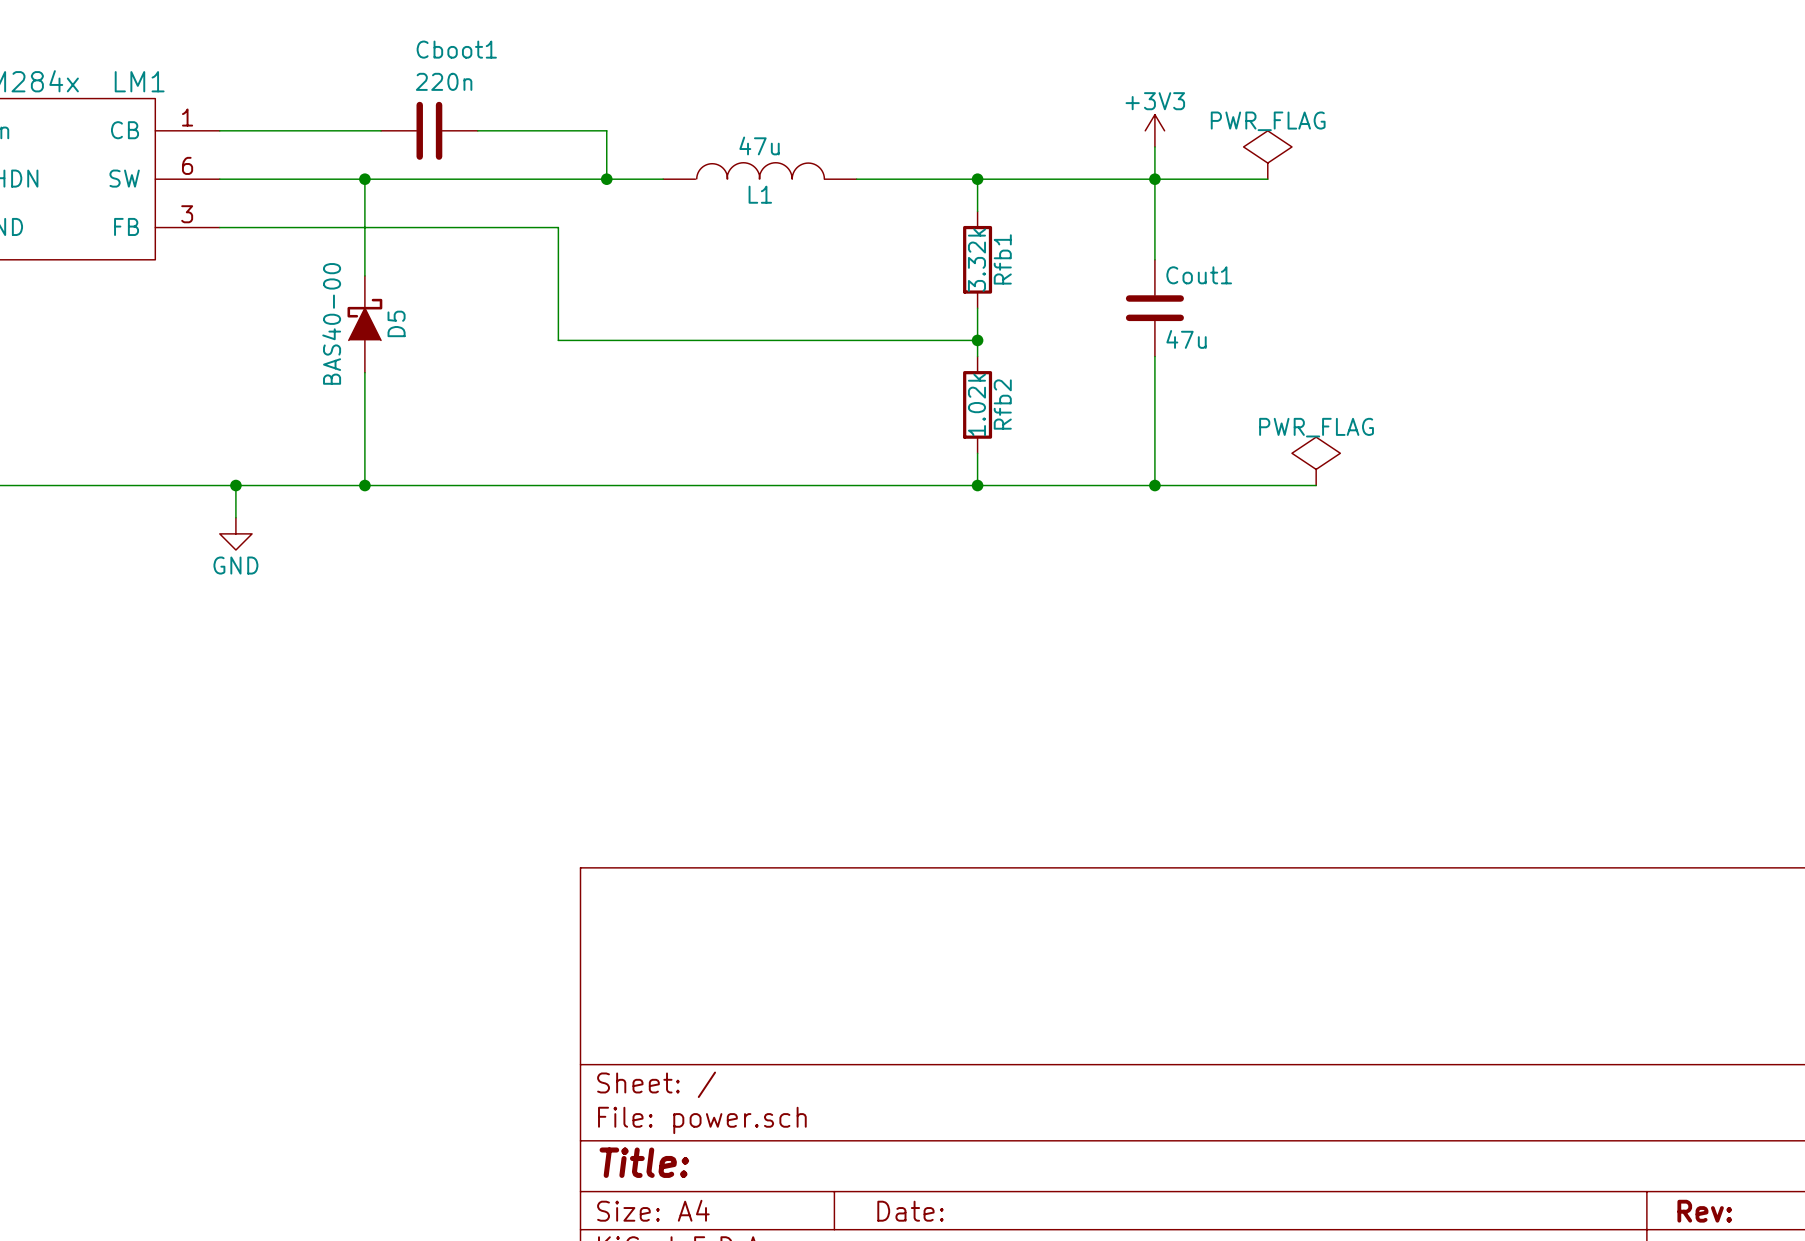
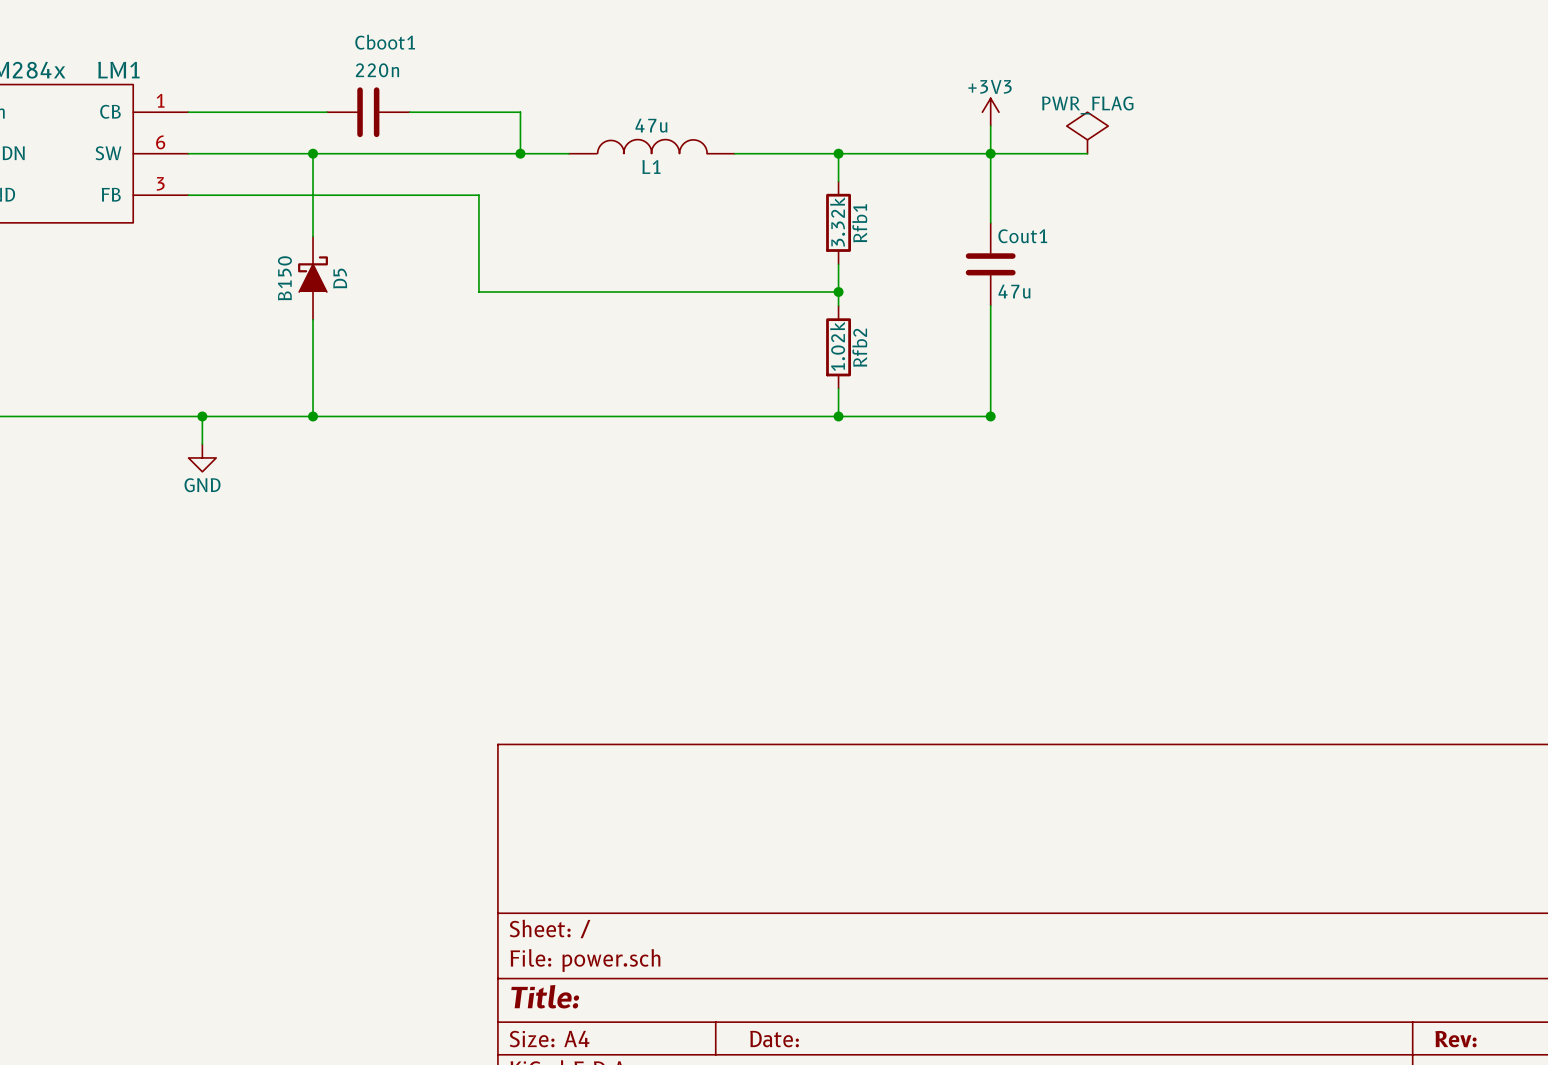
D5 value: BAS40-00 (331, 323) -> B150 (284, 278)
power symbol: PWR_FLAG (1316, 461) -> none
wire: (1154, 485) (1316, 485) -> none

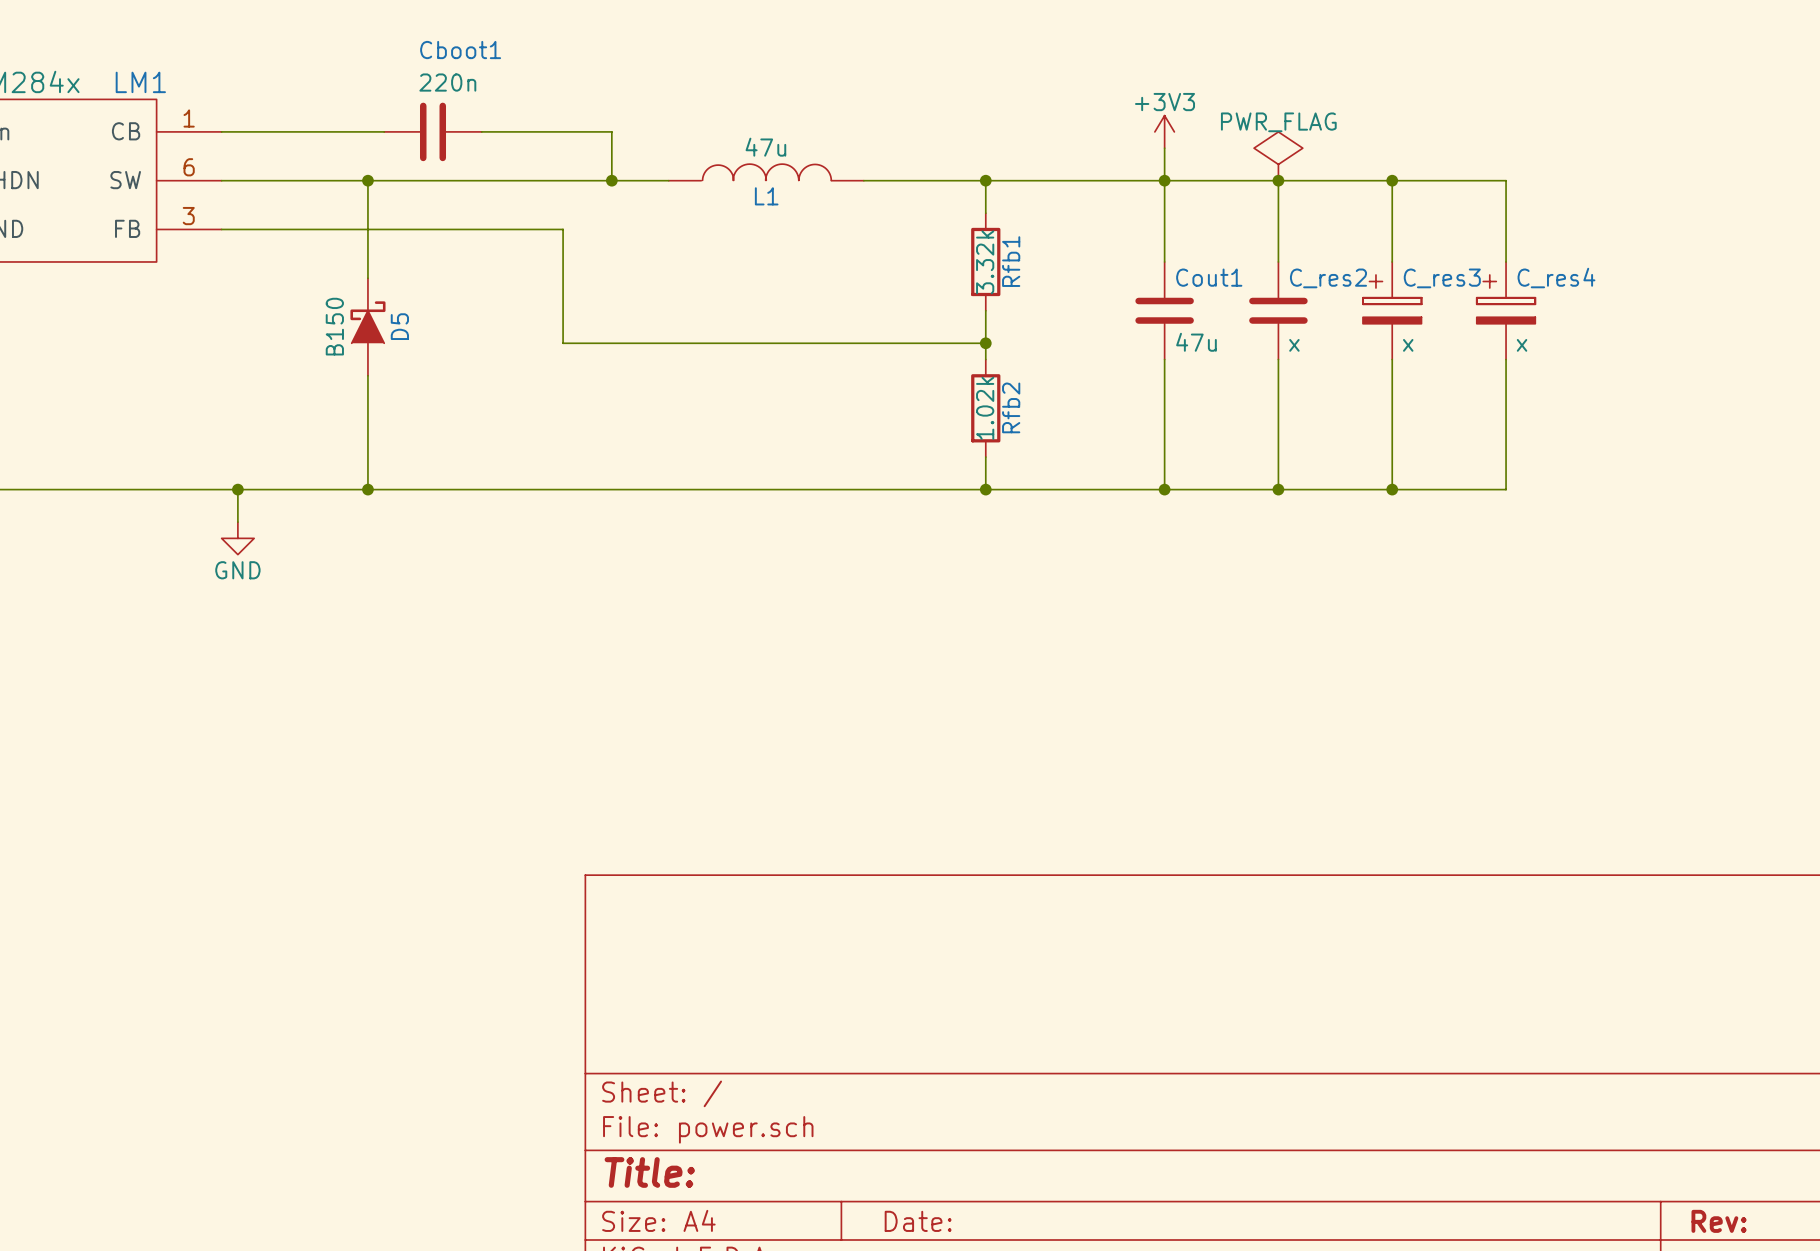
junction: none -> (1278, 180)
wire: none -> (1392, 180) (1392, 261)
junction: none -> (1392, 180)
wire: none -> (1278, 261) (1278, 180) (1506, 180) (1506, 261)
C_res2: none -> x (1278, 310)
C_res3: none -> x (1392, 310)
C_res4: none -> x (1506, 310)
wire: none -> (1278, 359) (1278, 489)
wire: none -> (1392, 359) (1392, 489)
wire: none -> (1506, 359) (1506, 489) (1164, 489)
junction: none -> (1278, 489)
junction: none -> (1392, 489)

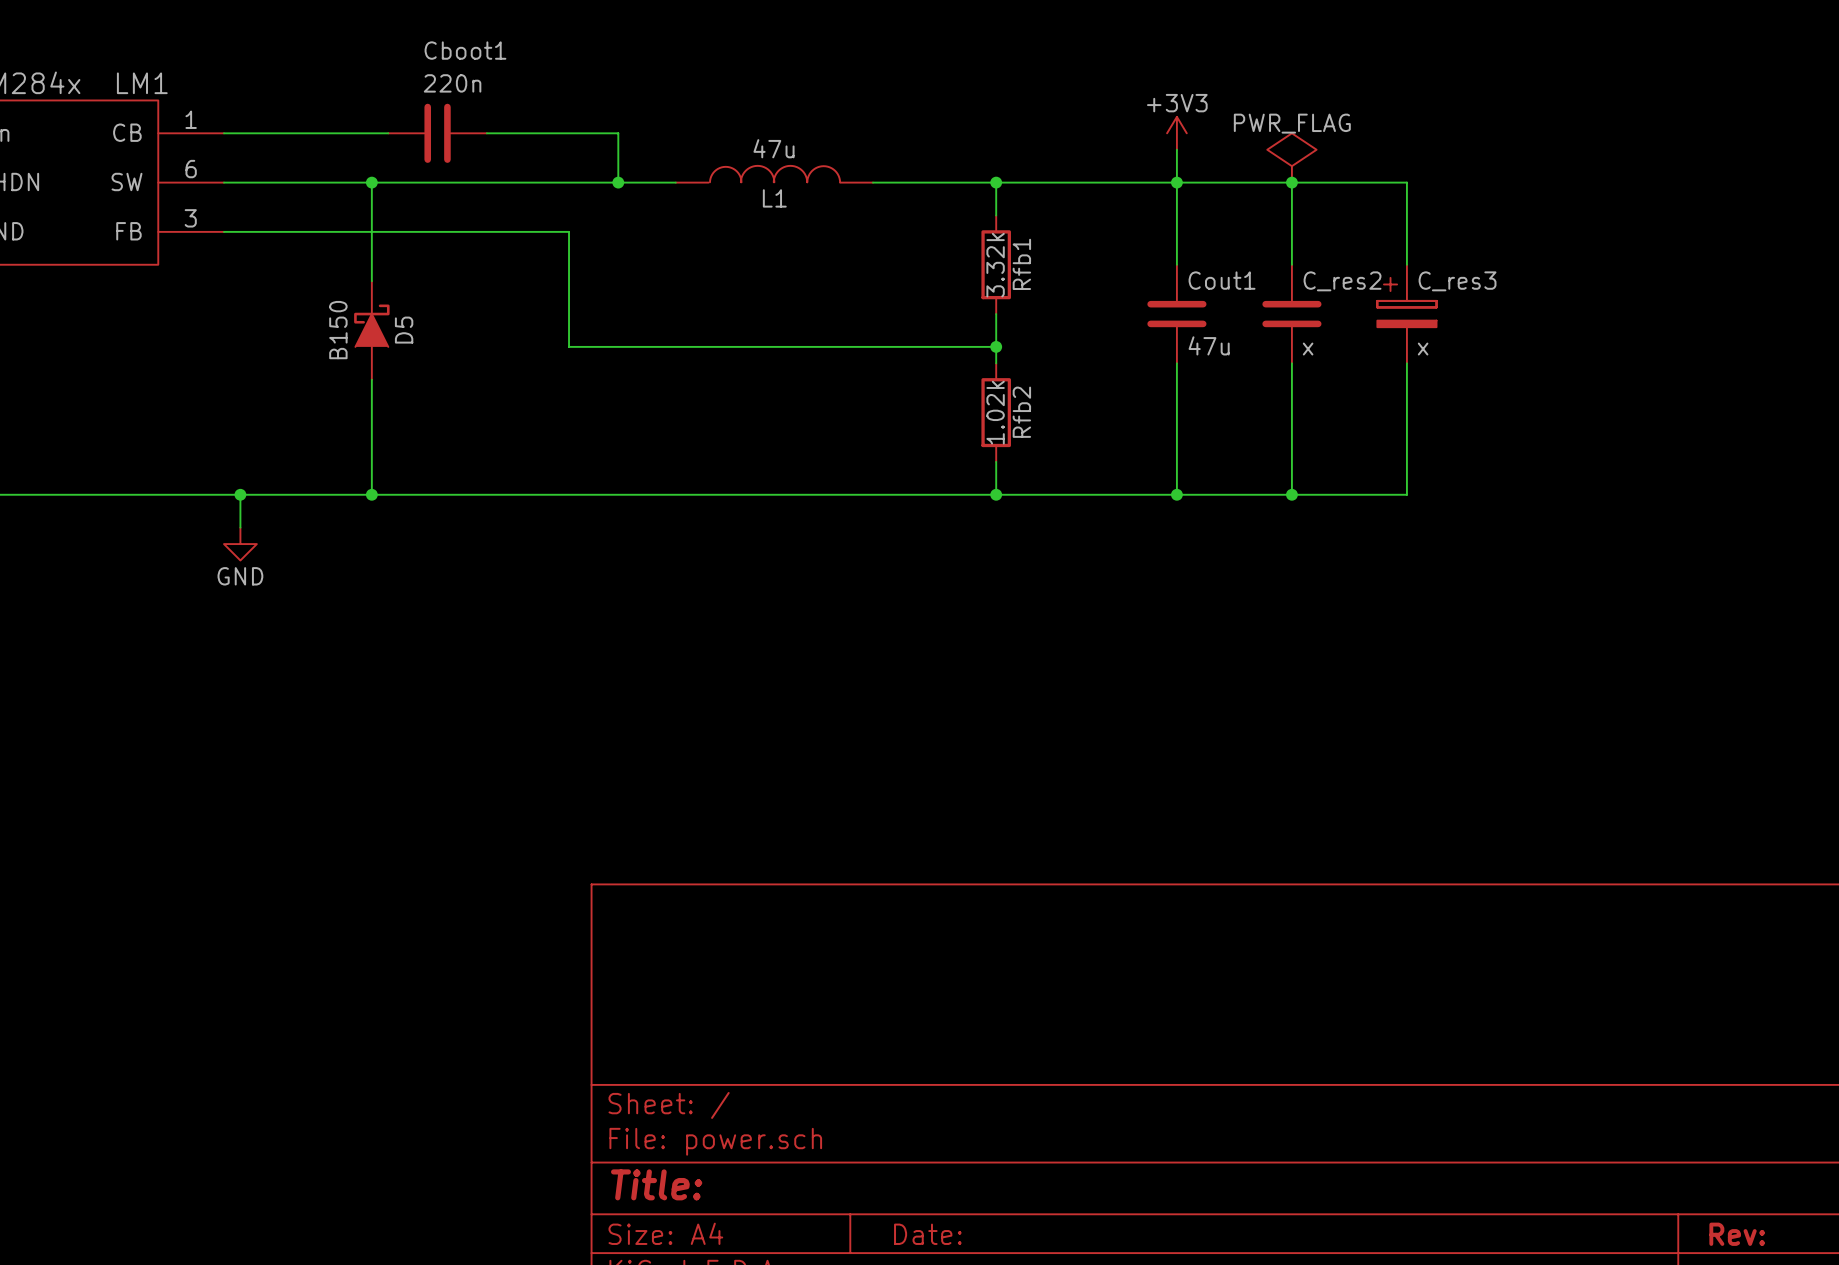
wire: (1392, 180) (1506, 180) (1506, 261) -> none
junction: (1392, 180) -> none
C_res4: x (1506, 310) -> none
wire: (1506, 359) (1506, 489) (1392, 489) -> none
junction: (1392, 489) -> none

